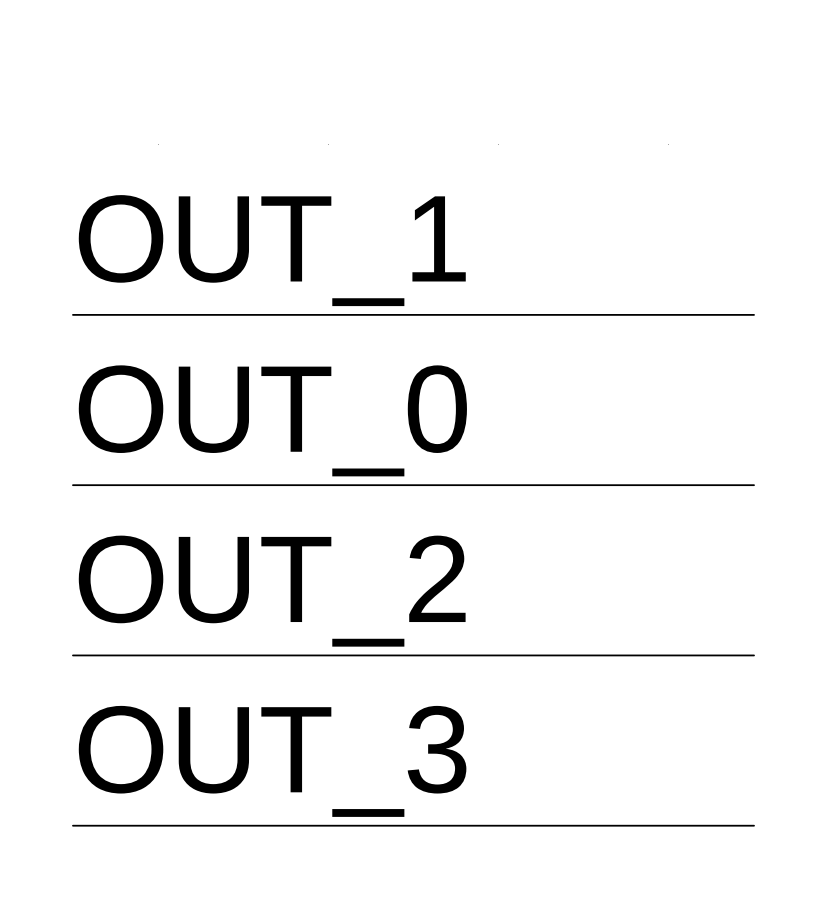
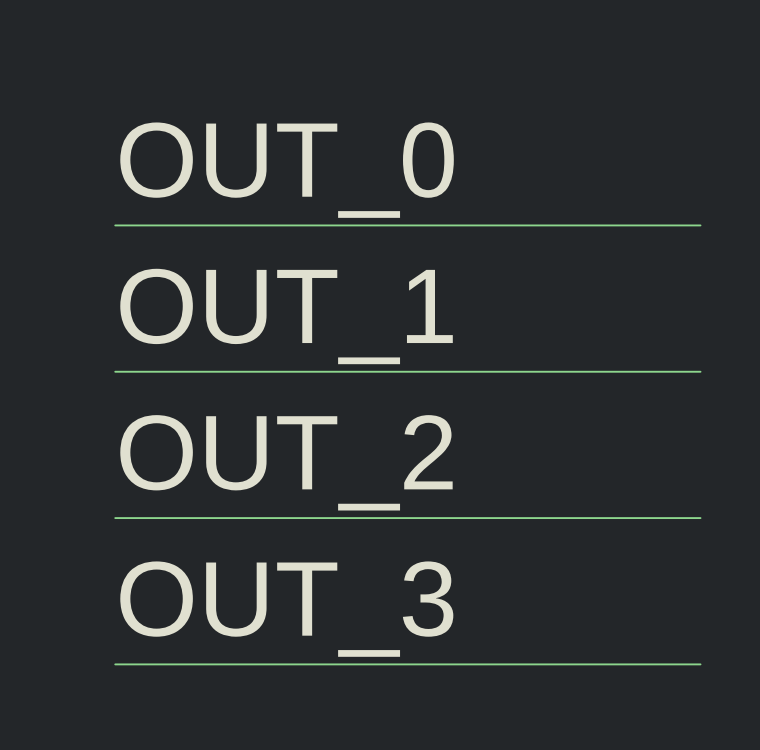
label: OUT_1 (272, 250) -> OUT_0 (287, 170)
label: OUT_0 (272, 420) -> OUT_1 (286, 316)

